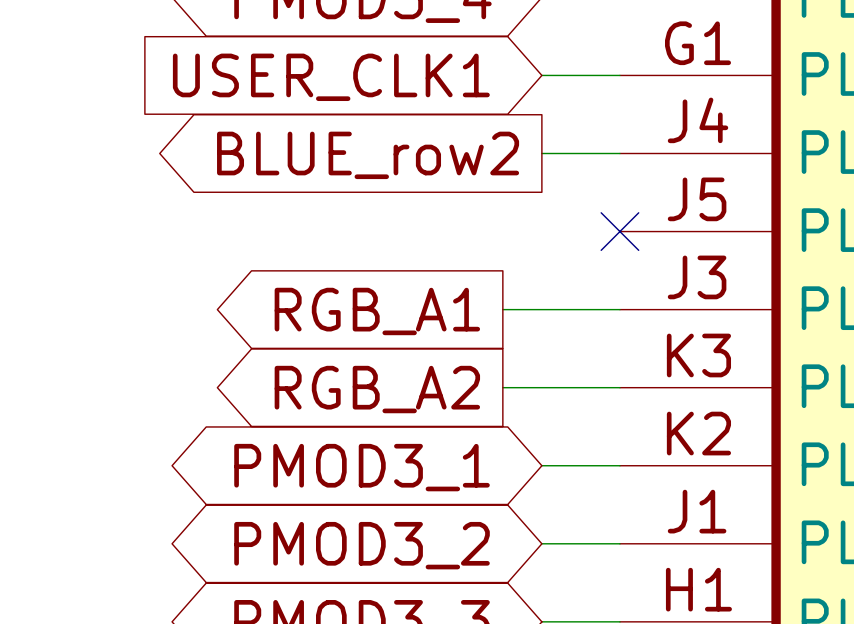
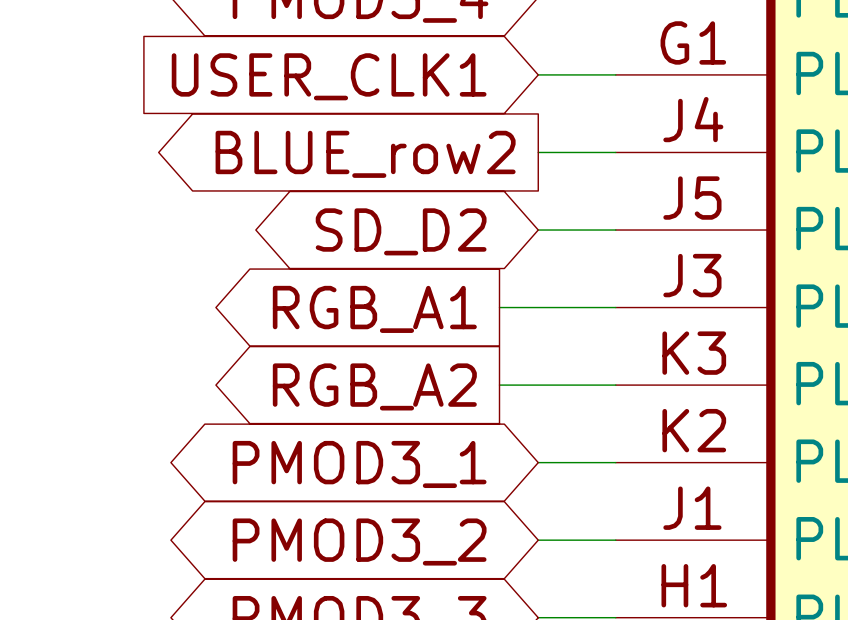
wire: none -> (538, 230) (615, 230)
no-connect mark: (619, 231) -> none
global label: none -> SD_D2 (401, 231)

